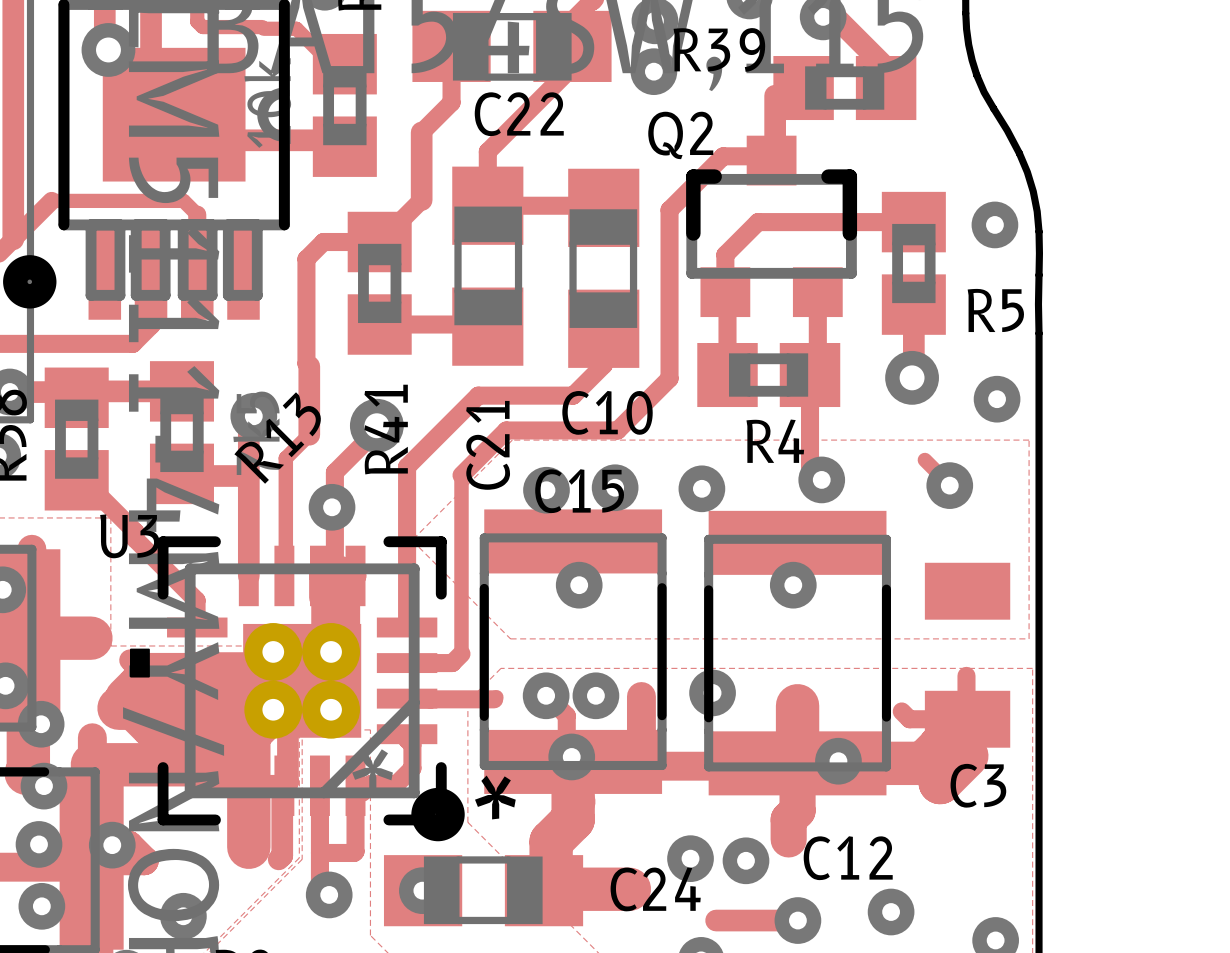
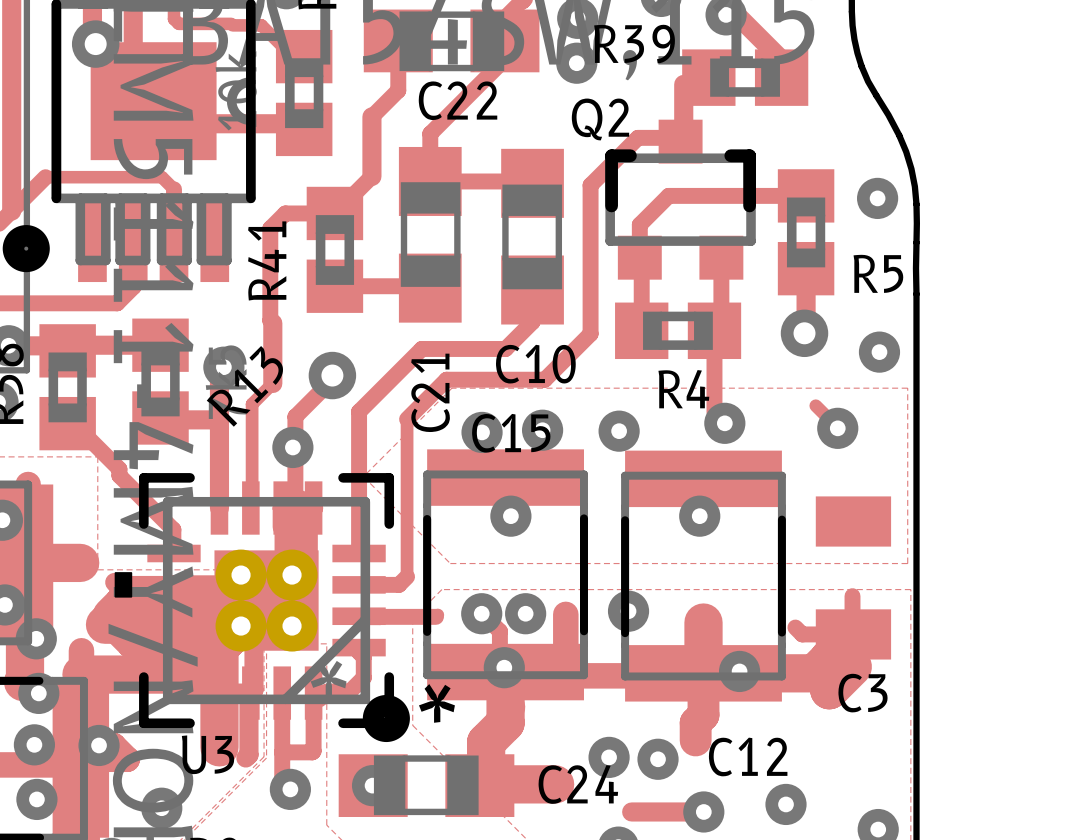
R41 name position: R41 (386, 429) -> R41 (267, 260)
U3 name position: U3 (129, 536) -> U3 (207, 754)

